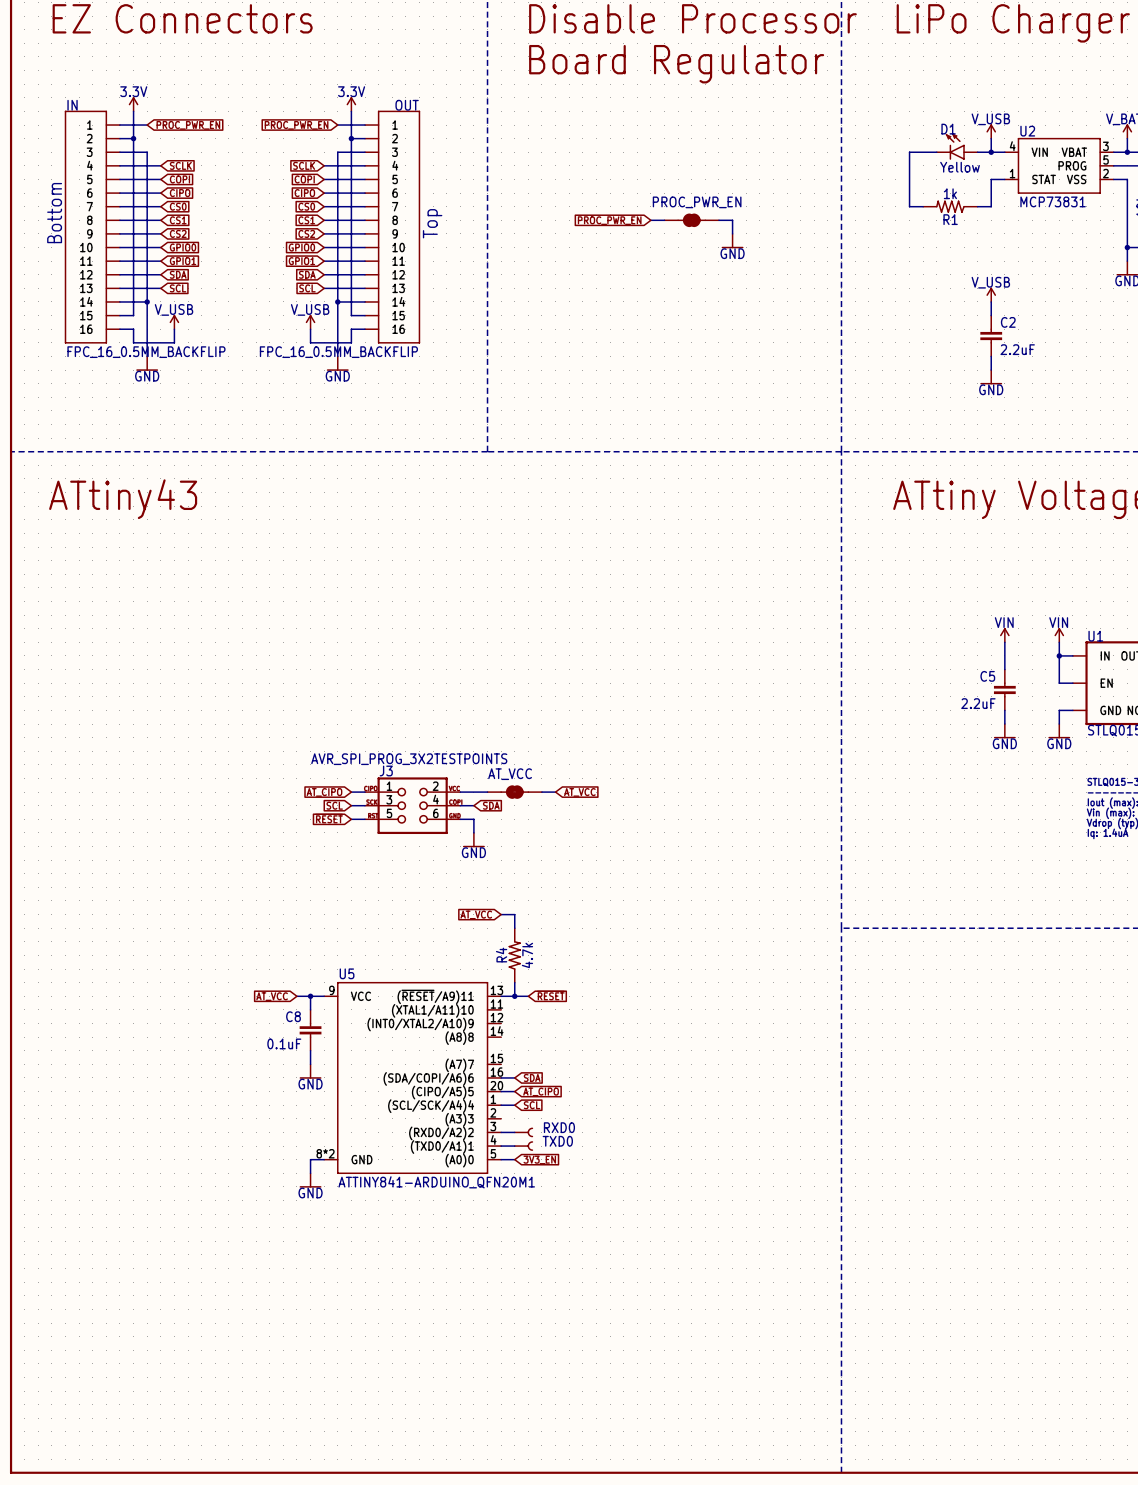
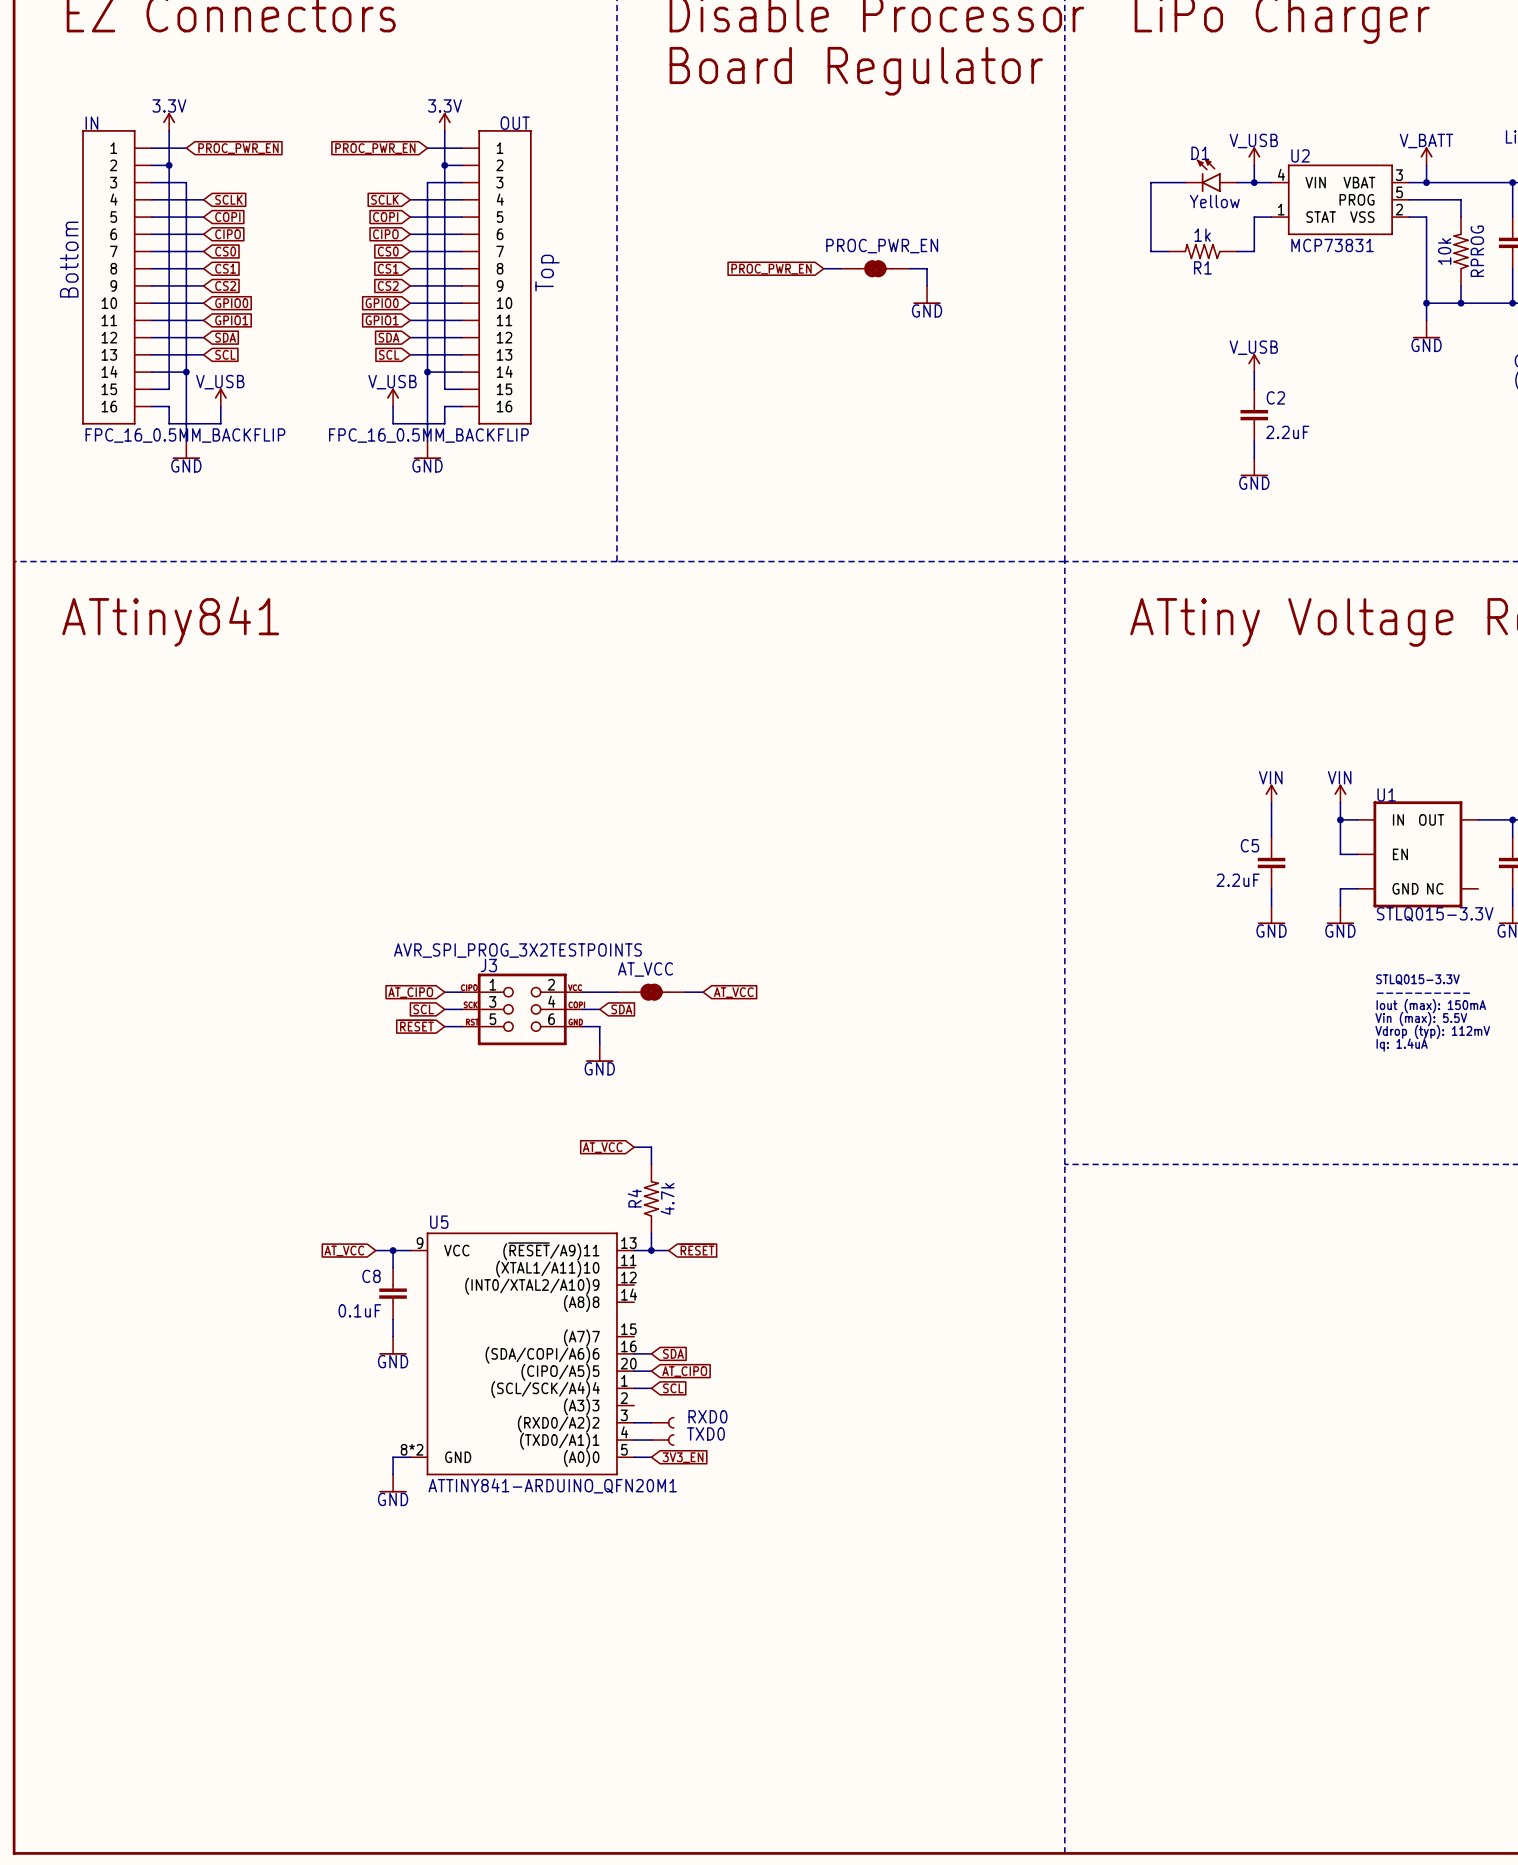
text: ATtiny43 (123, 499) -> ATtiny841 (170, 621)

